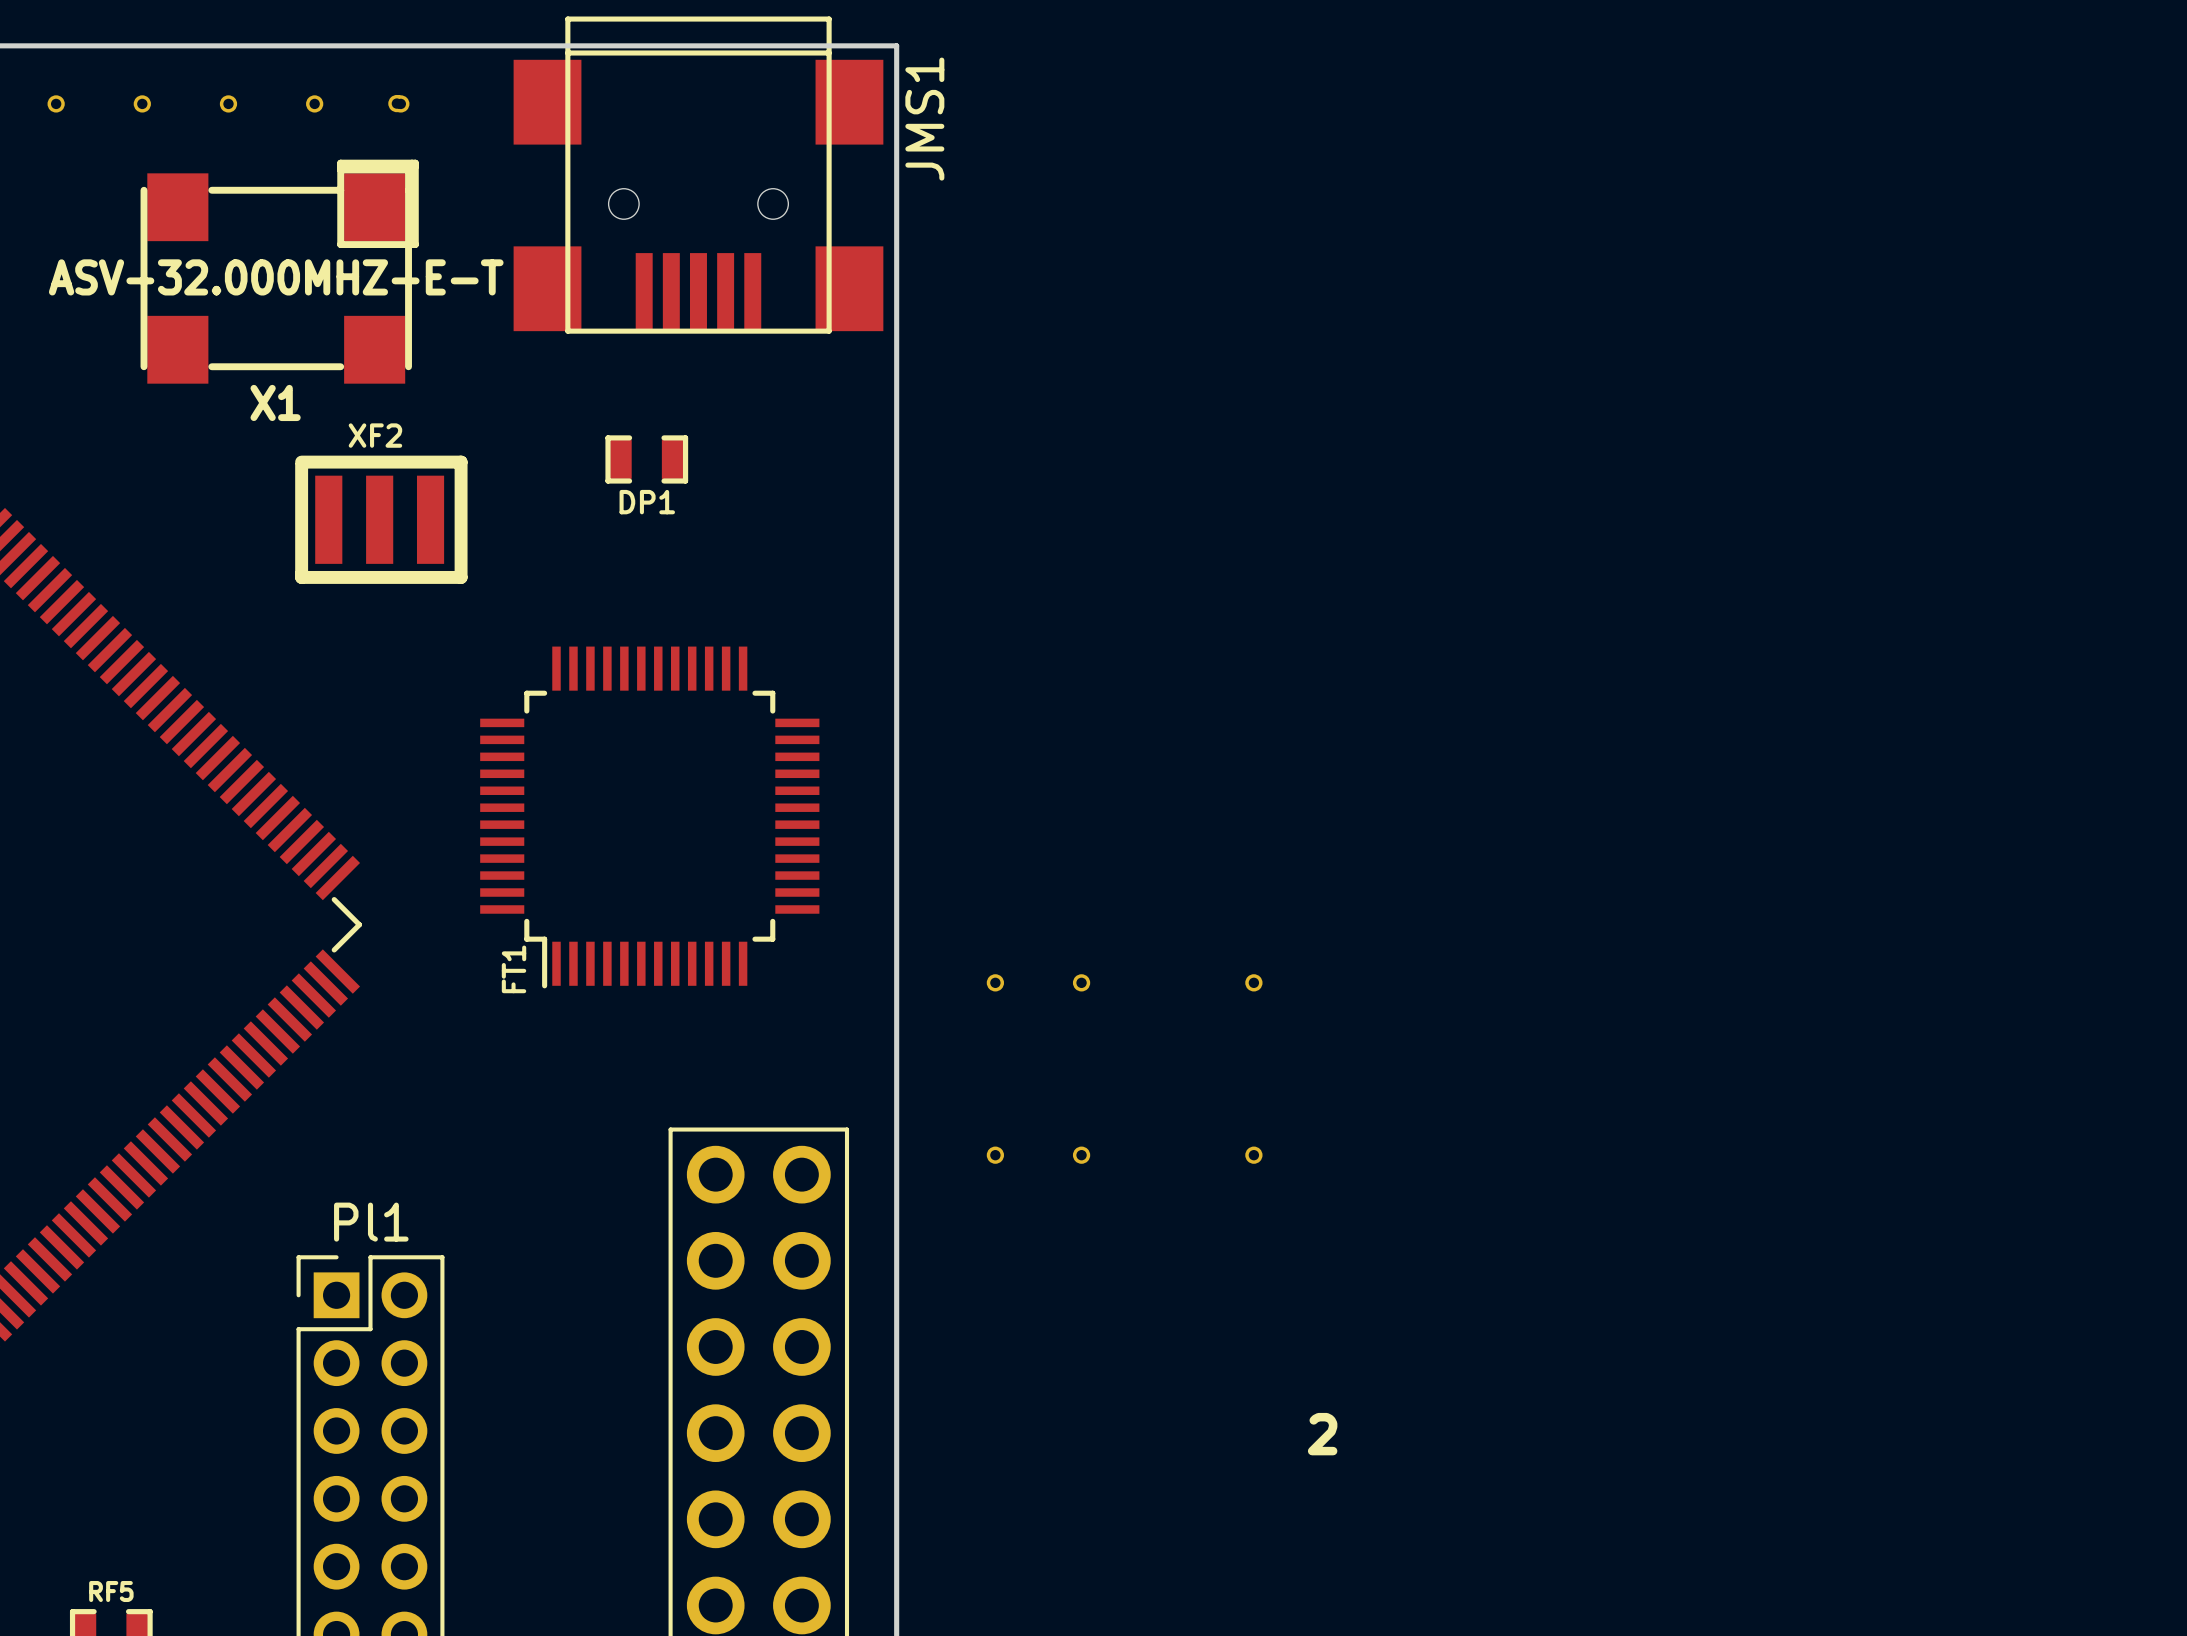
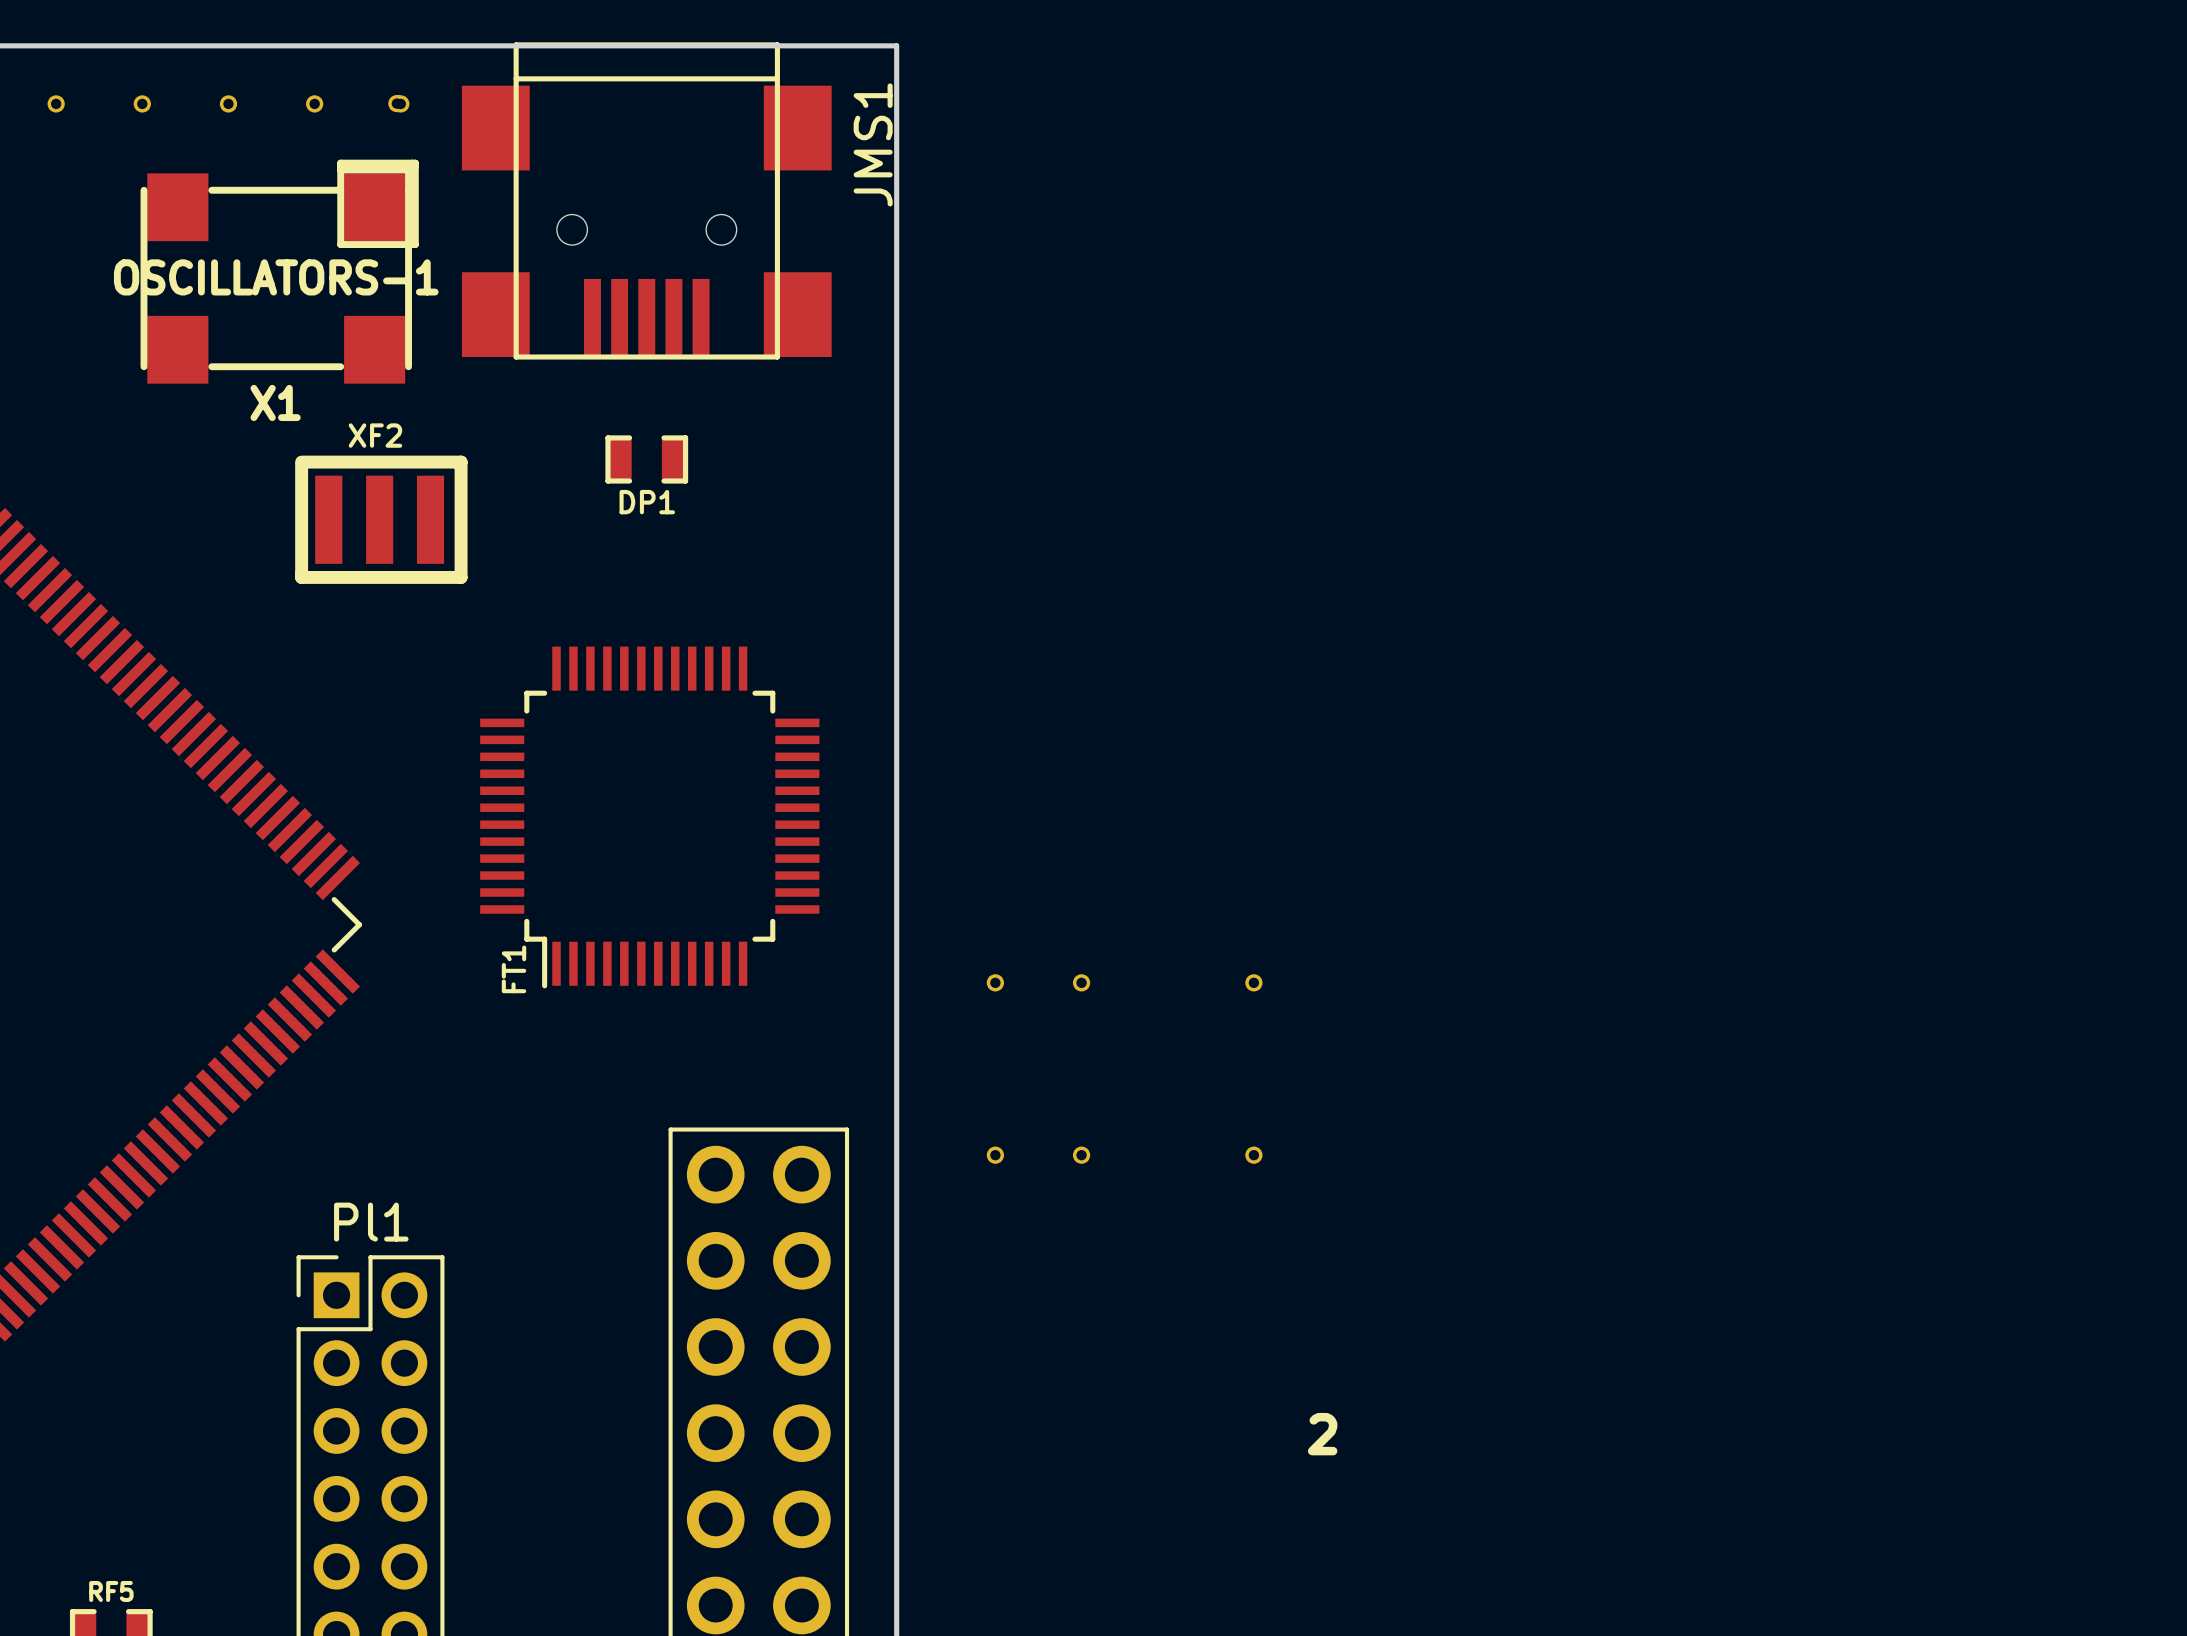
JMS1 position: (698, 175) -> (646, 200)
X1 value: ASV-32.000MHZ-E-T (276, 277) -> OSCILLATORS-1 (276, 277)

